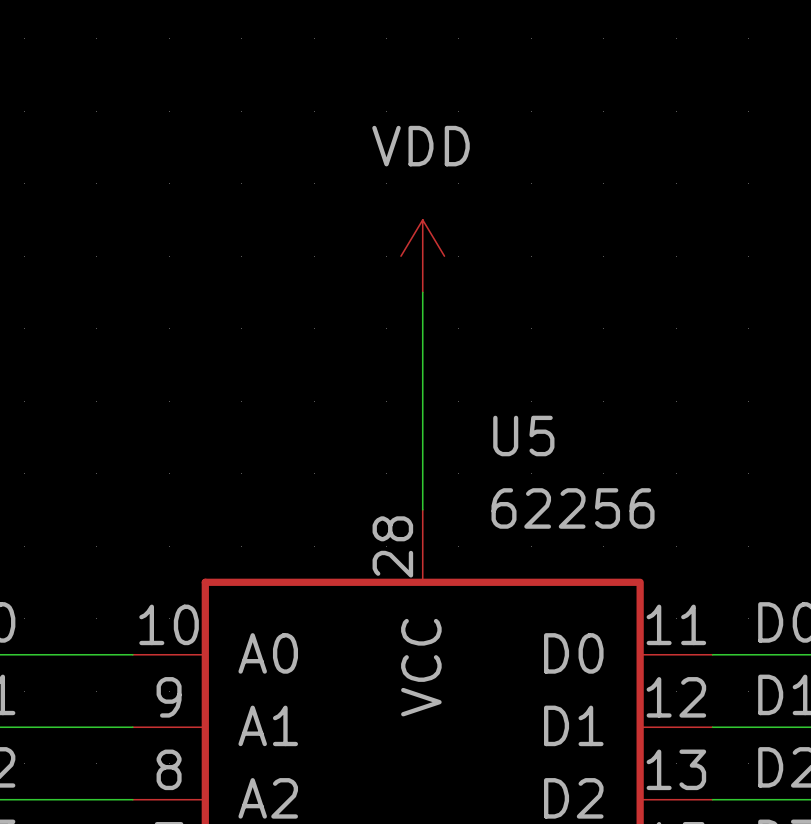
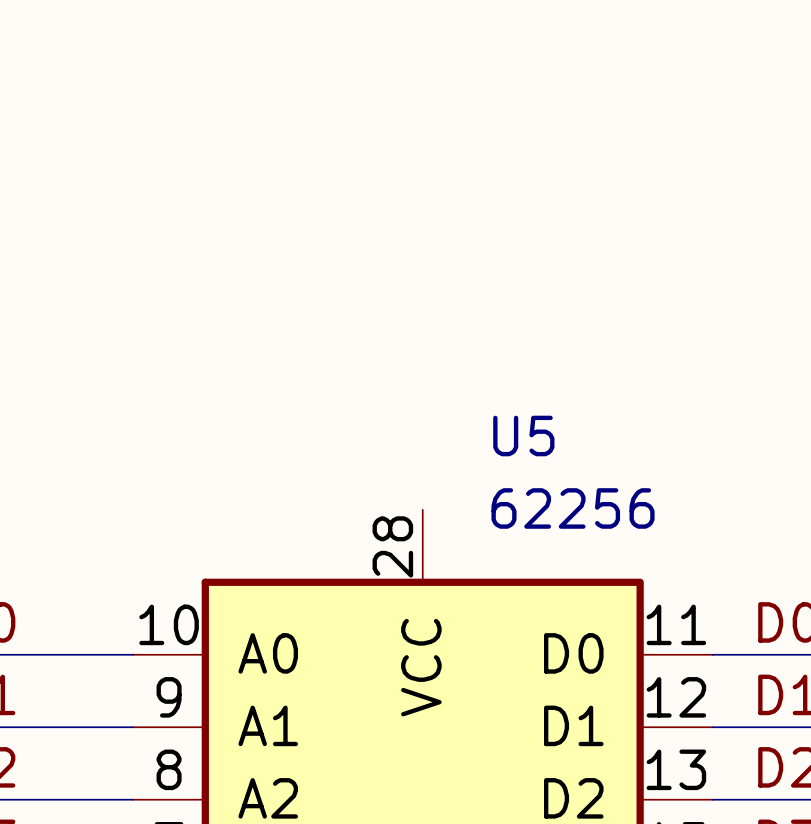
power symbol: VDD (422, 256) -> none
wire: (422, 292) (422, 509) -> none

